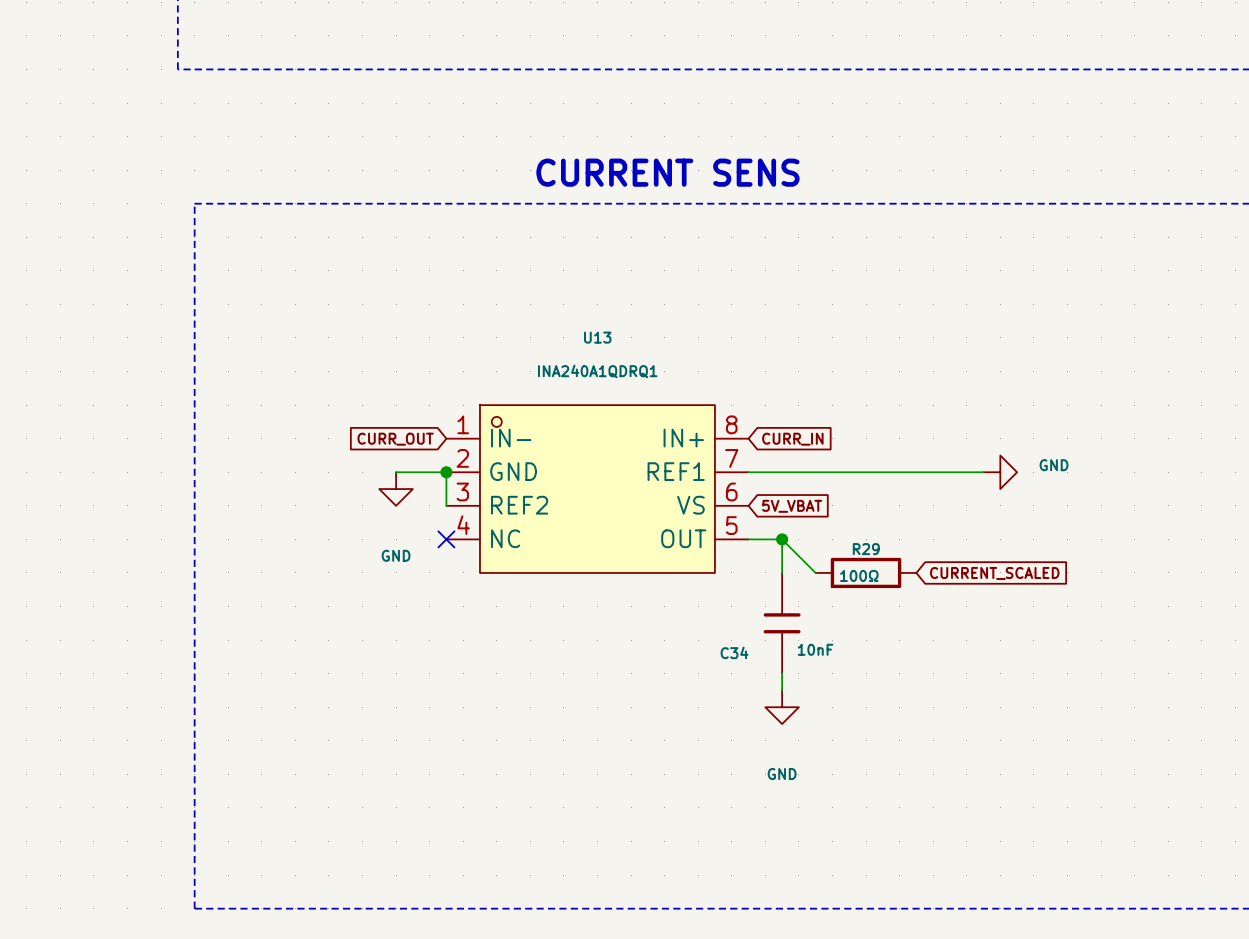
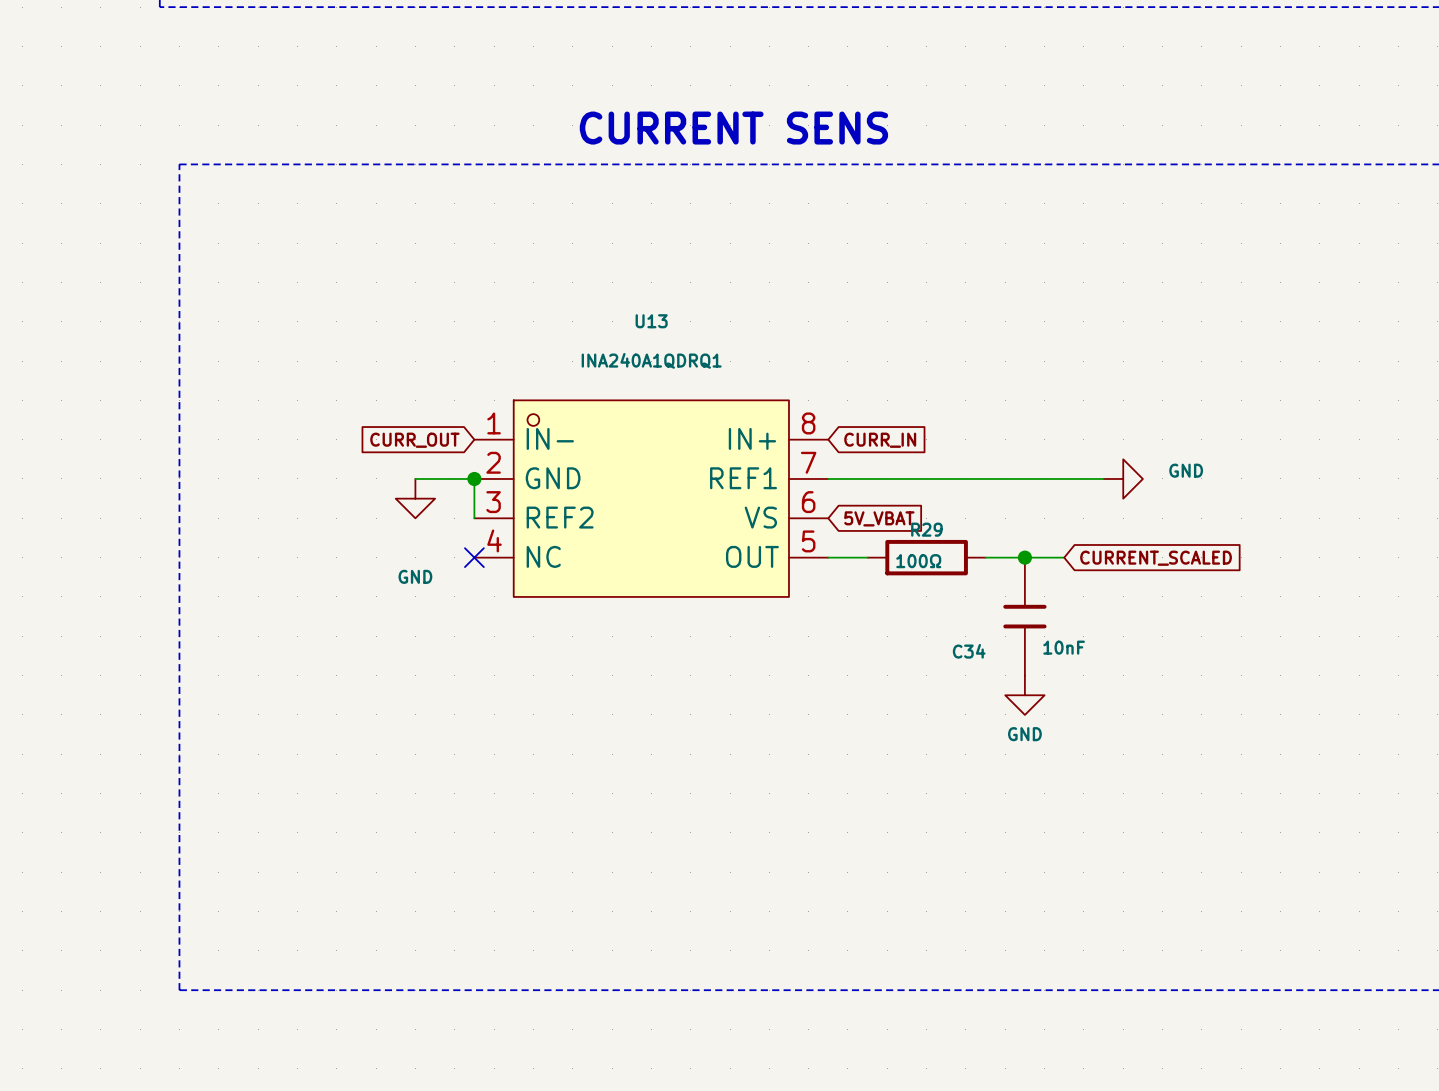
junction: (782, 539) -> none
wire: none -> (985, 557) (1064, 557)
junction: none -> (1024, 557)
wire: (782, 572) (782, 539) (815, 572) -> none
R29 position: (866, 572) -> (926, 557)
global label position: CURRENT_SCALED (994, 573) -> CURRENT_SCALED (1156, 558)
C34 position: (782, 623) -> (1024, 616)
wire: (782, 673) (782, 690) -> none
power symbol position: GND (782, 707) -> GND (1024, 695)
power symbol text position: GND (782, 774) -> GND (1024, 734)

